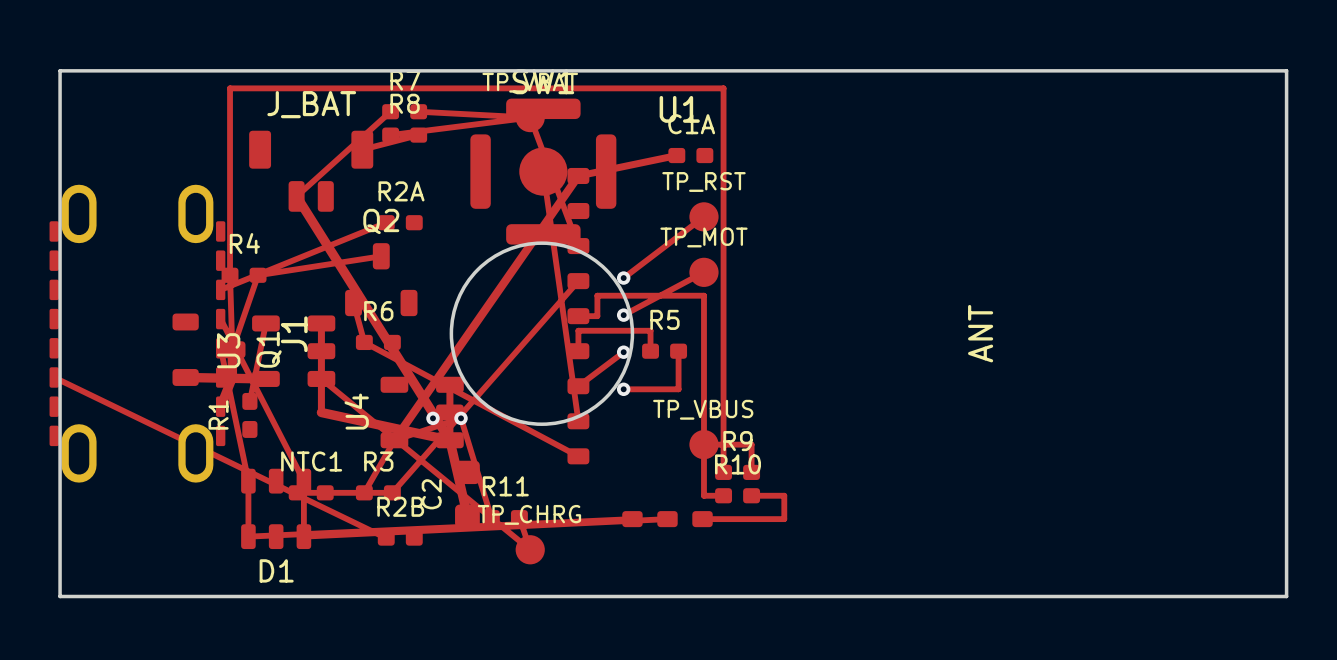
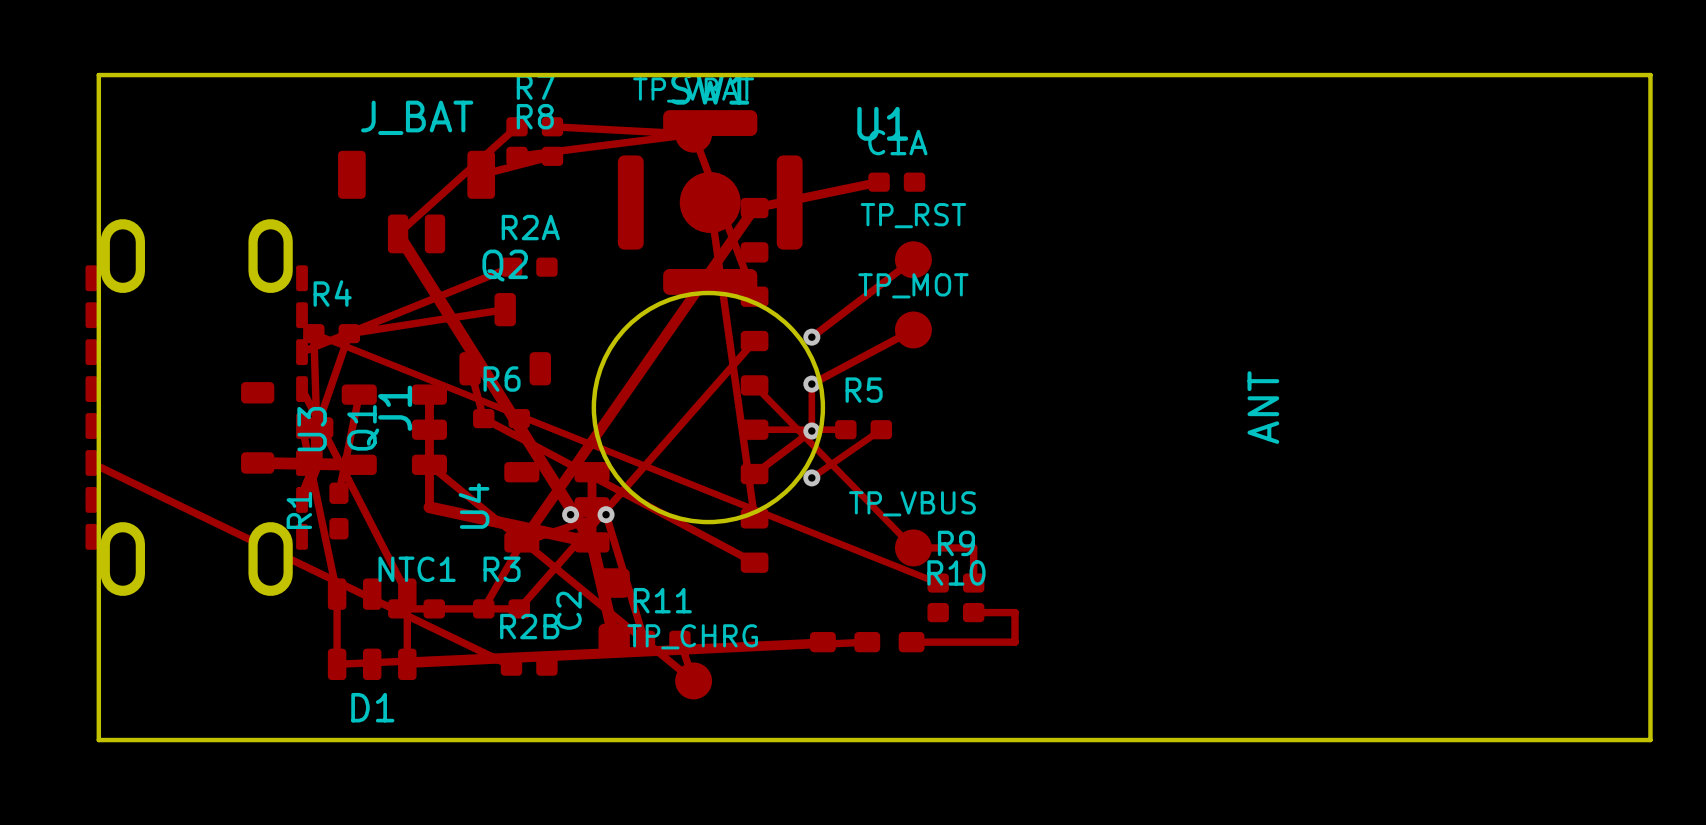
track: (230, 275) (230, 88) (723, 88) (723, 472) -> (313, 333) (938, 583)
track: none -> (811, 384) (811, 431)
track: (578, 316) (597, 316) (597, 295) (703, 295) (703, 495) (723, 495) -> (754, 385) (913, 547)
track: (578, 351) (578, 330) (650, 330) (650, 351) -> (754, 429) (845, 429)
track: (678, 351) (678, 389) (623, 389) -> (881, 429) (811, 477)

